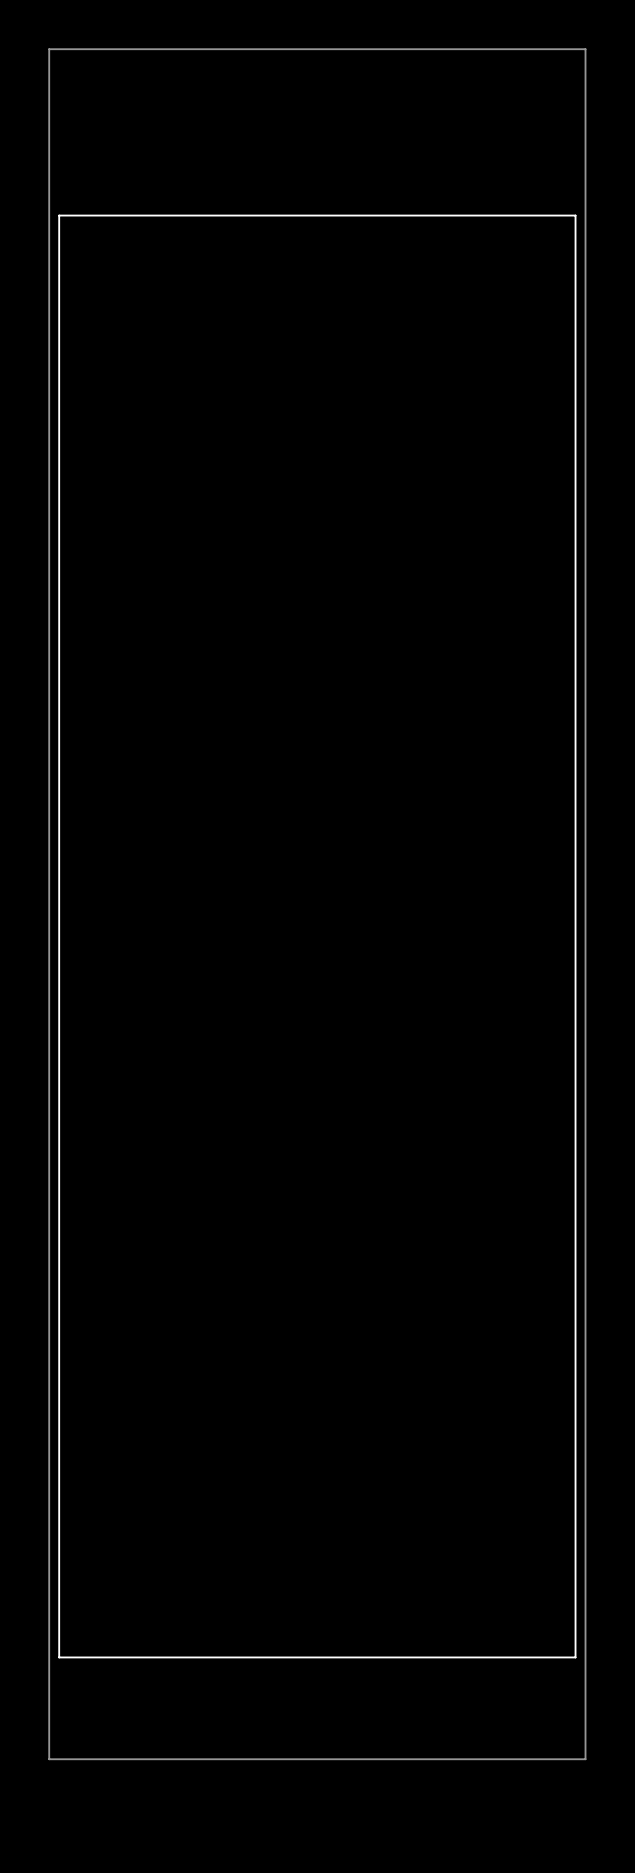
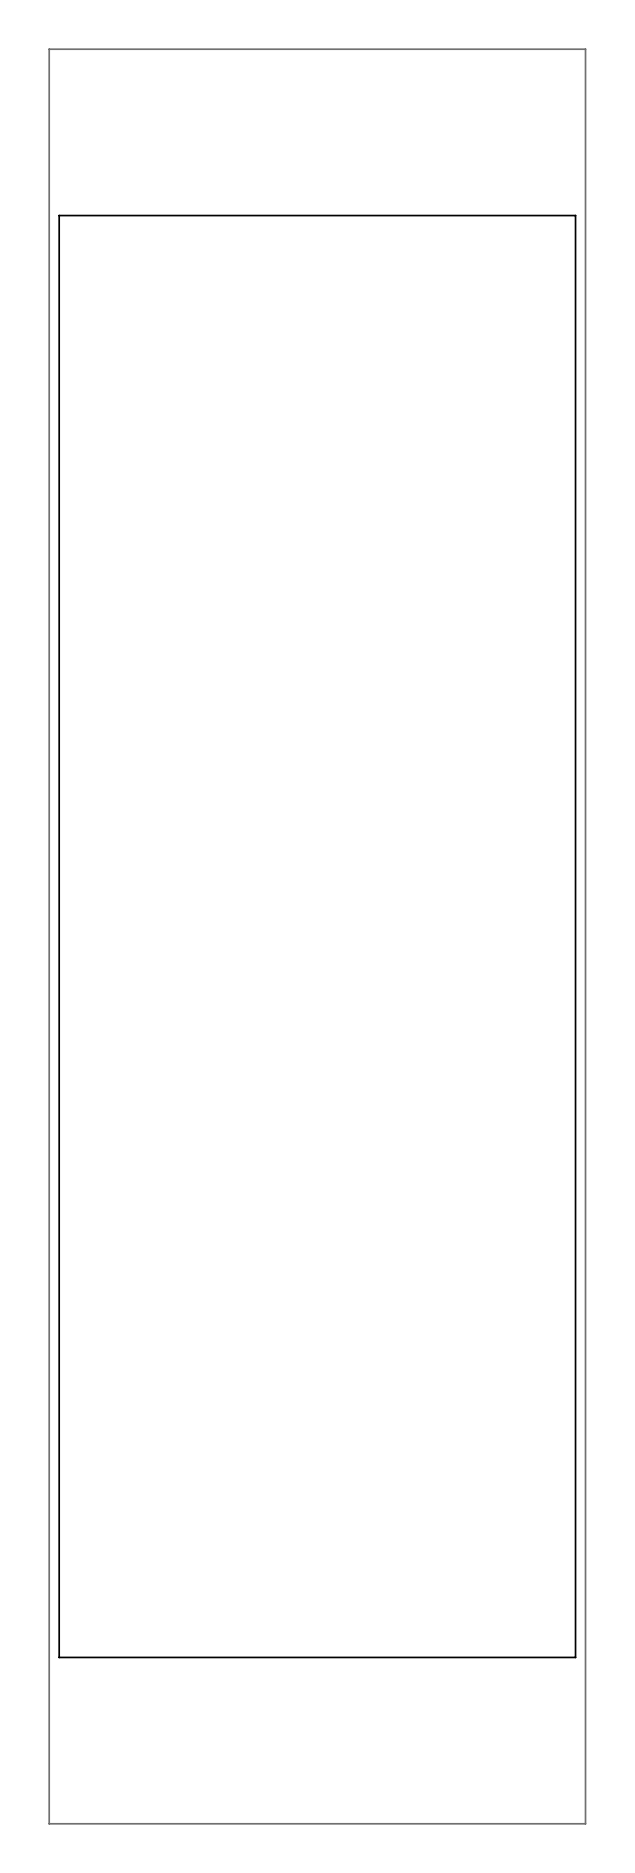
line: (49, 1759) (585, 1759) -> (49, 1759) (49, 1823) (585, 1823) (585, 1759)

